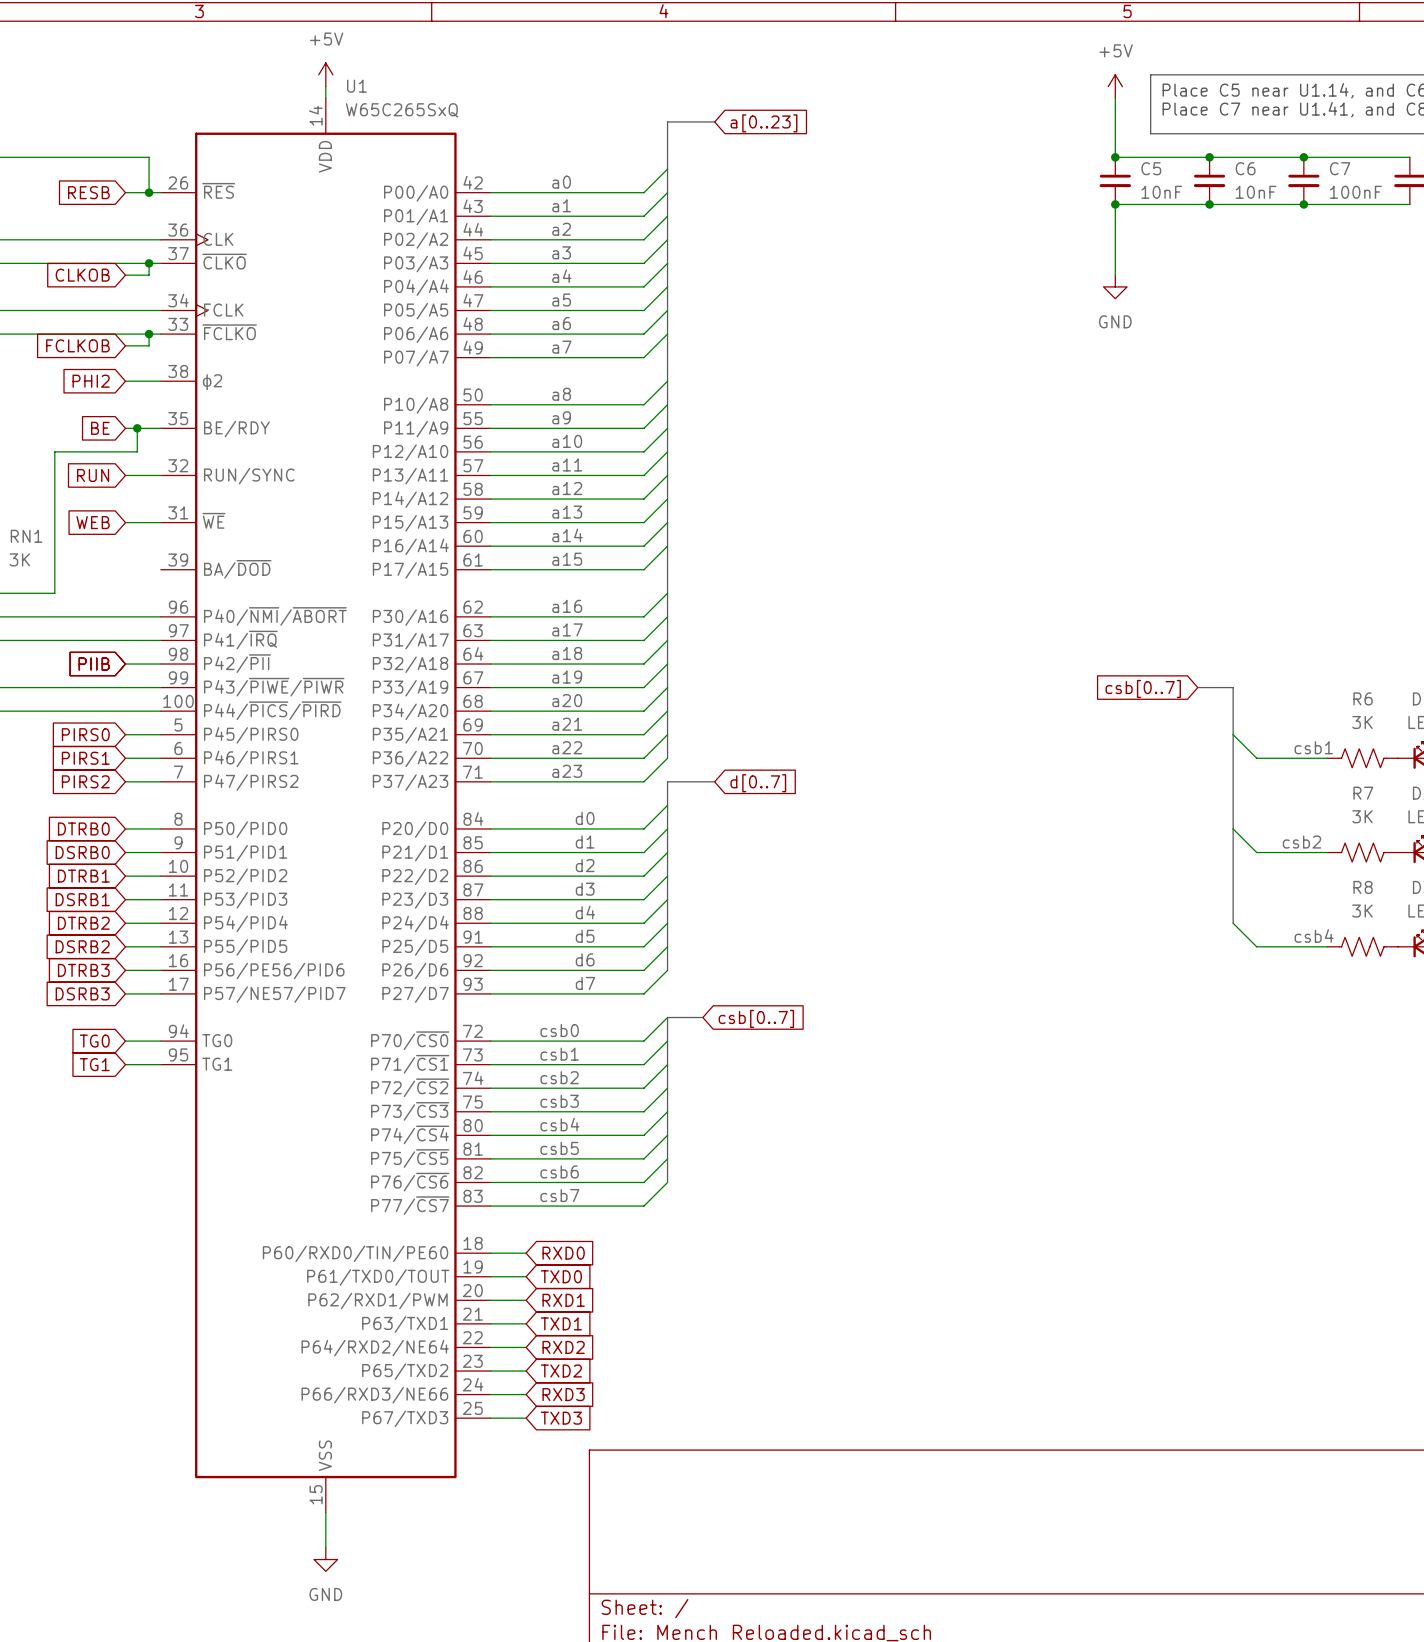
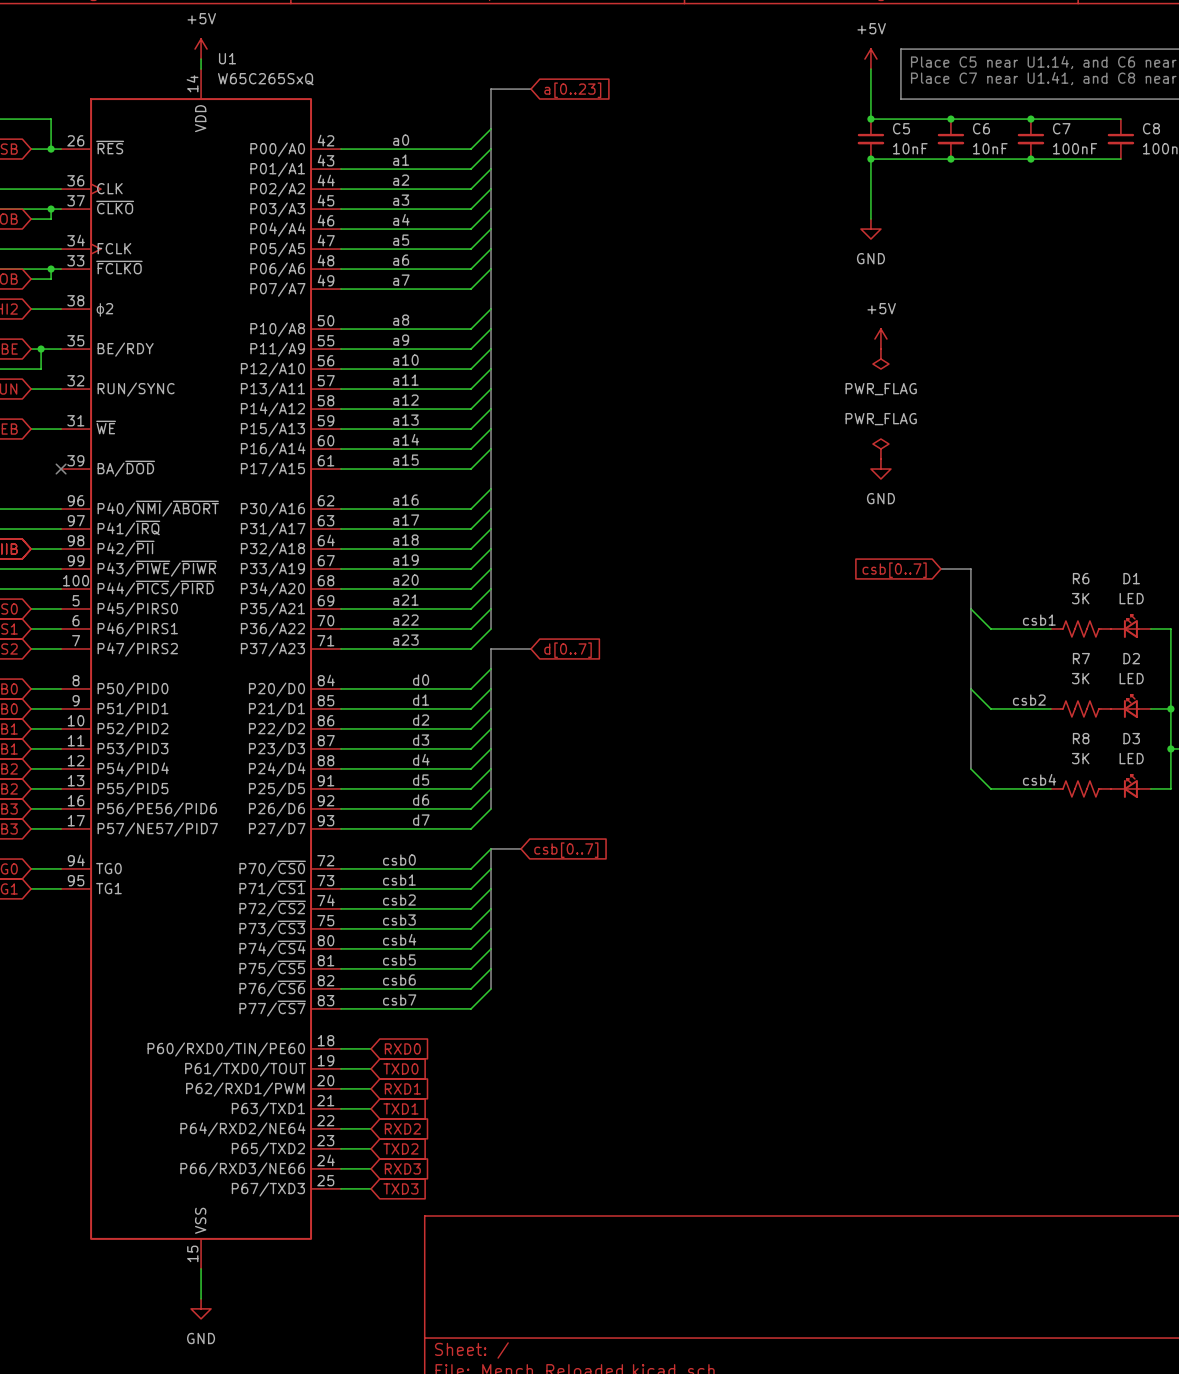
power symbol: none -> +5V (880, 339)
power symbol: none -> PWR_FLAG (880, 359)
power symbol: none -> PWR_FLAG (880, 449)
no-connect mark: none -> (61, 469)
power symbol: none -> GND (880, 469)

